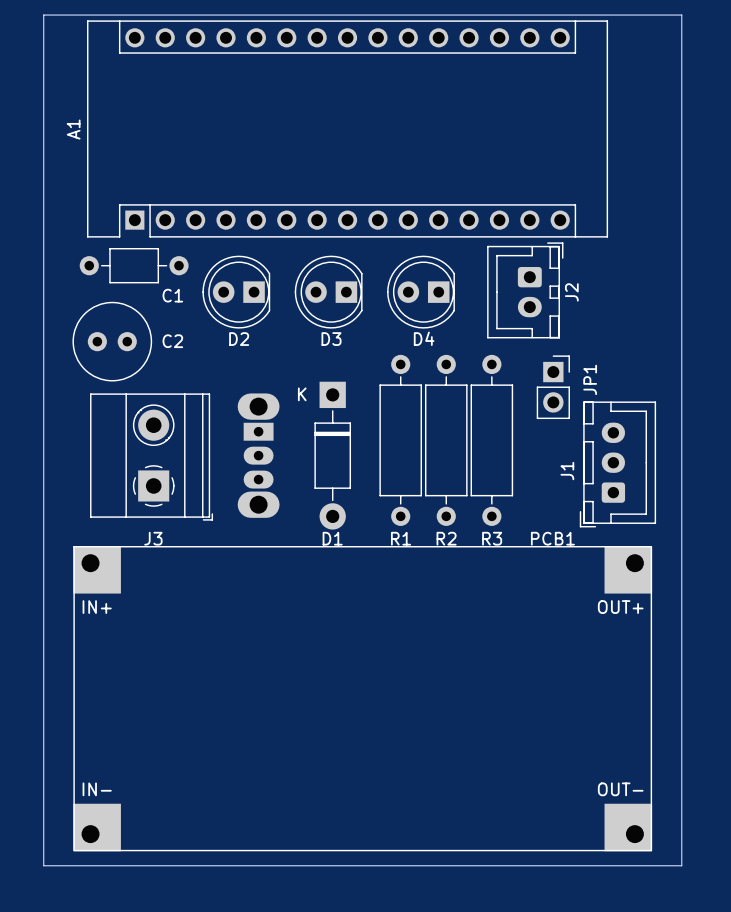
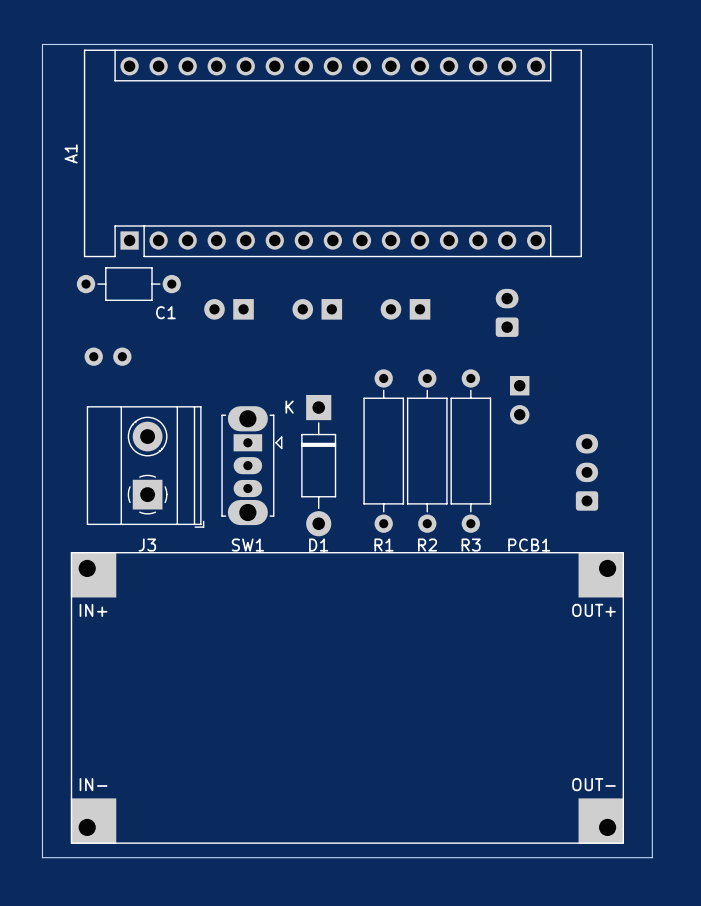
J2 side: top (525, 290) -> bottom (507, 312)
D2 side: top (236, 292) -> bottom (405, 309)
D3 side: top (328, 292) -> bottom (317, 309)
D4 side: top (420, 292) -> bottom (229, 309)
C2 side: top (112, 341) -> bottom (108, 356)
JP1 side: top (553, 387) -> bottom (519, 400)
SW1 side: bottom (258, 455) -> top (251, 465)
J1 side: top (617, 464) -> bottom (587, 472)

